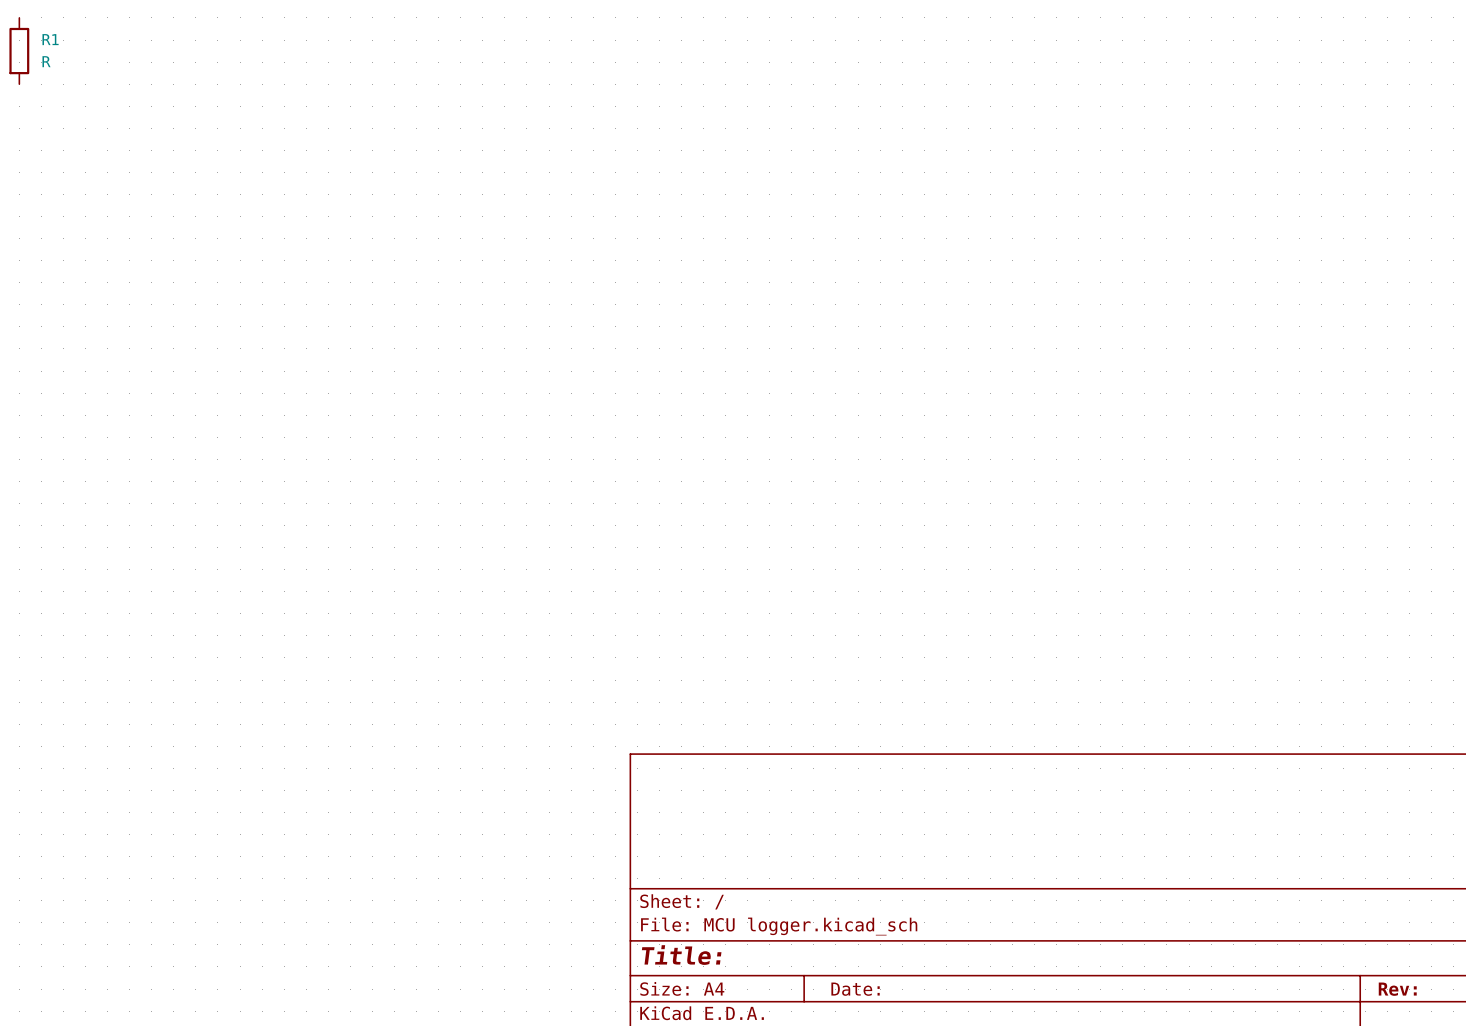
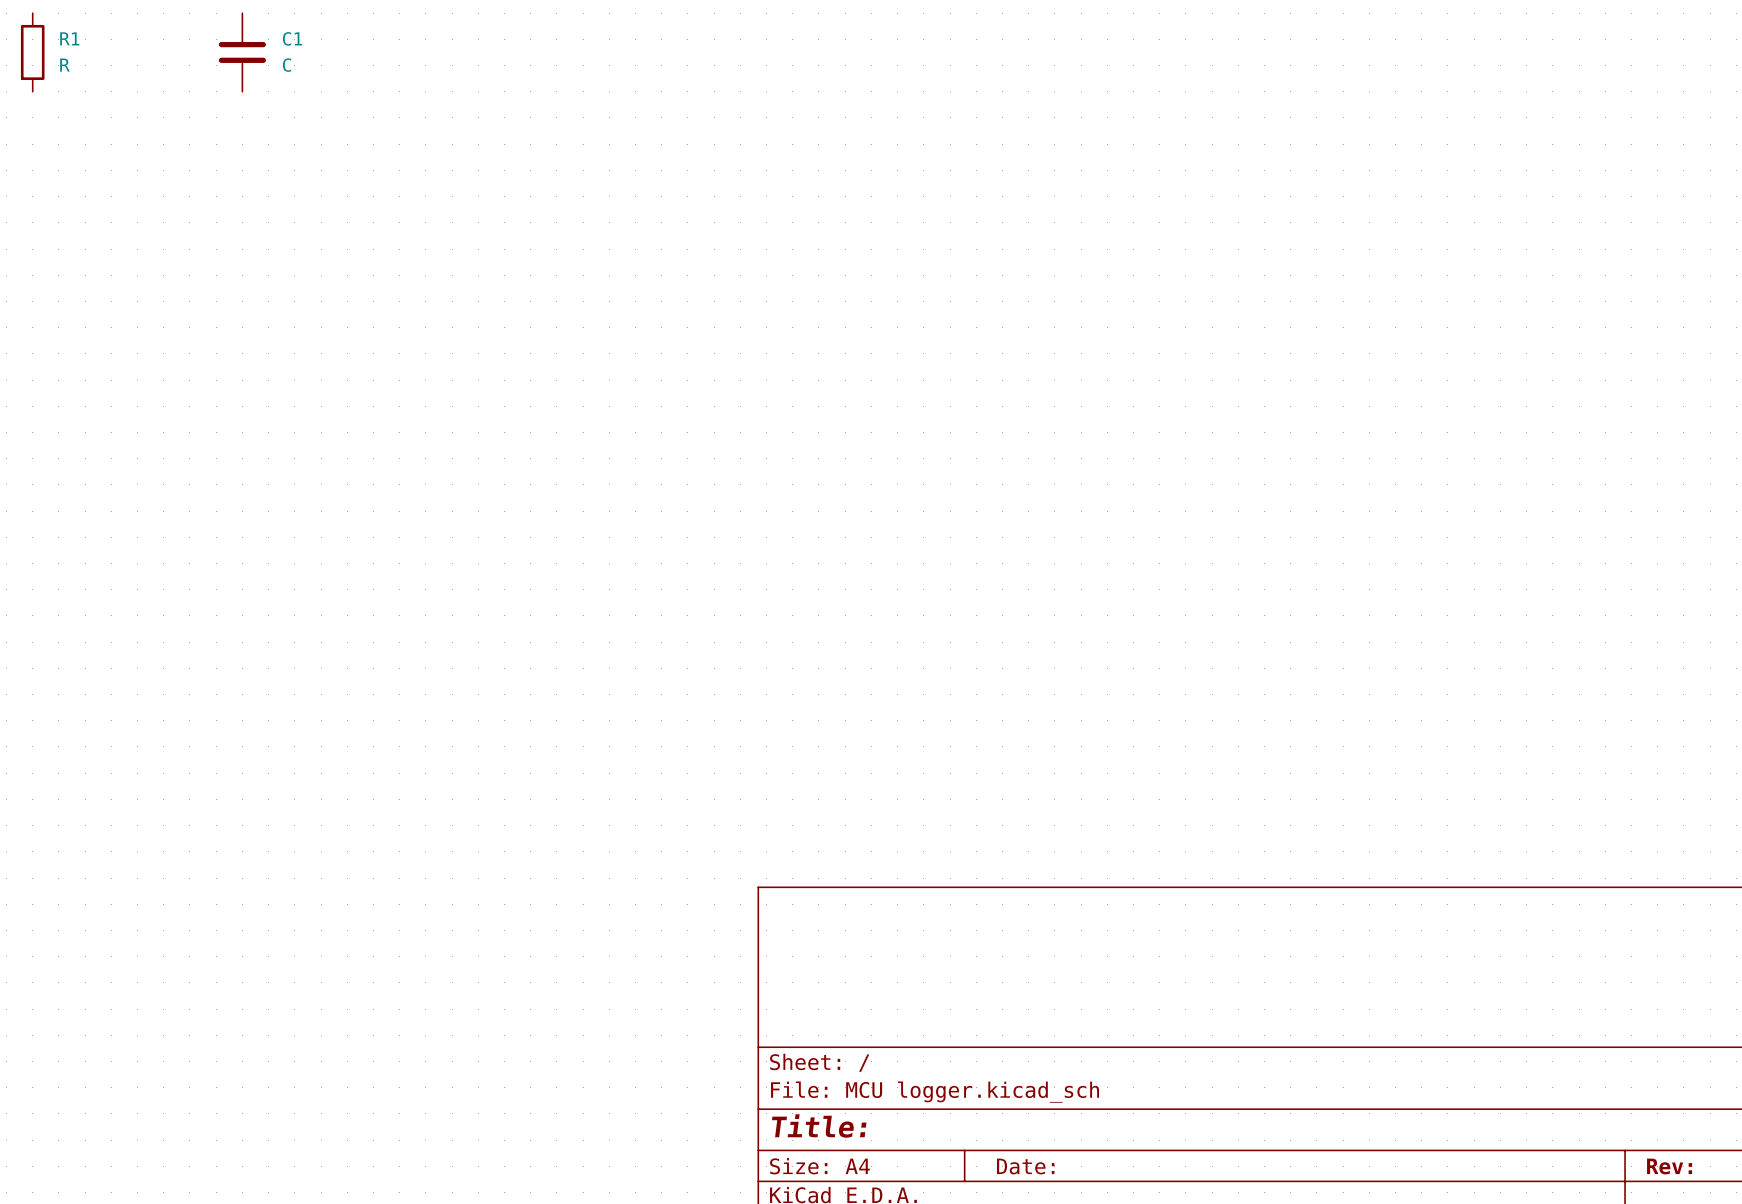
C1: none -> C (242, 52)

